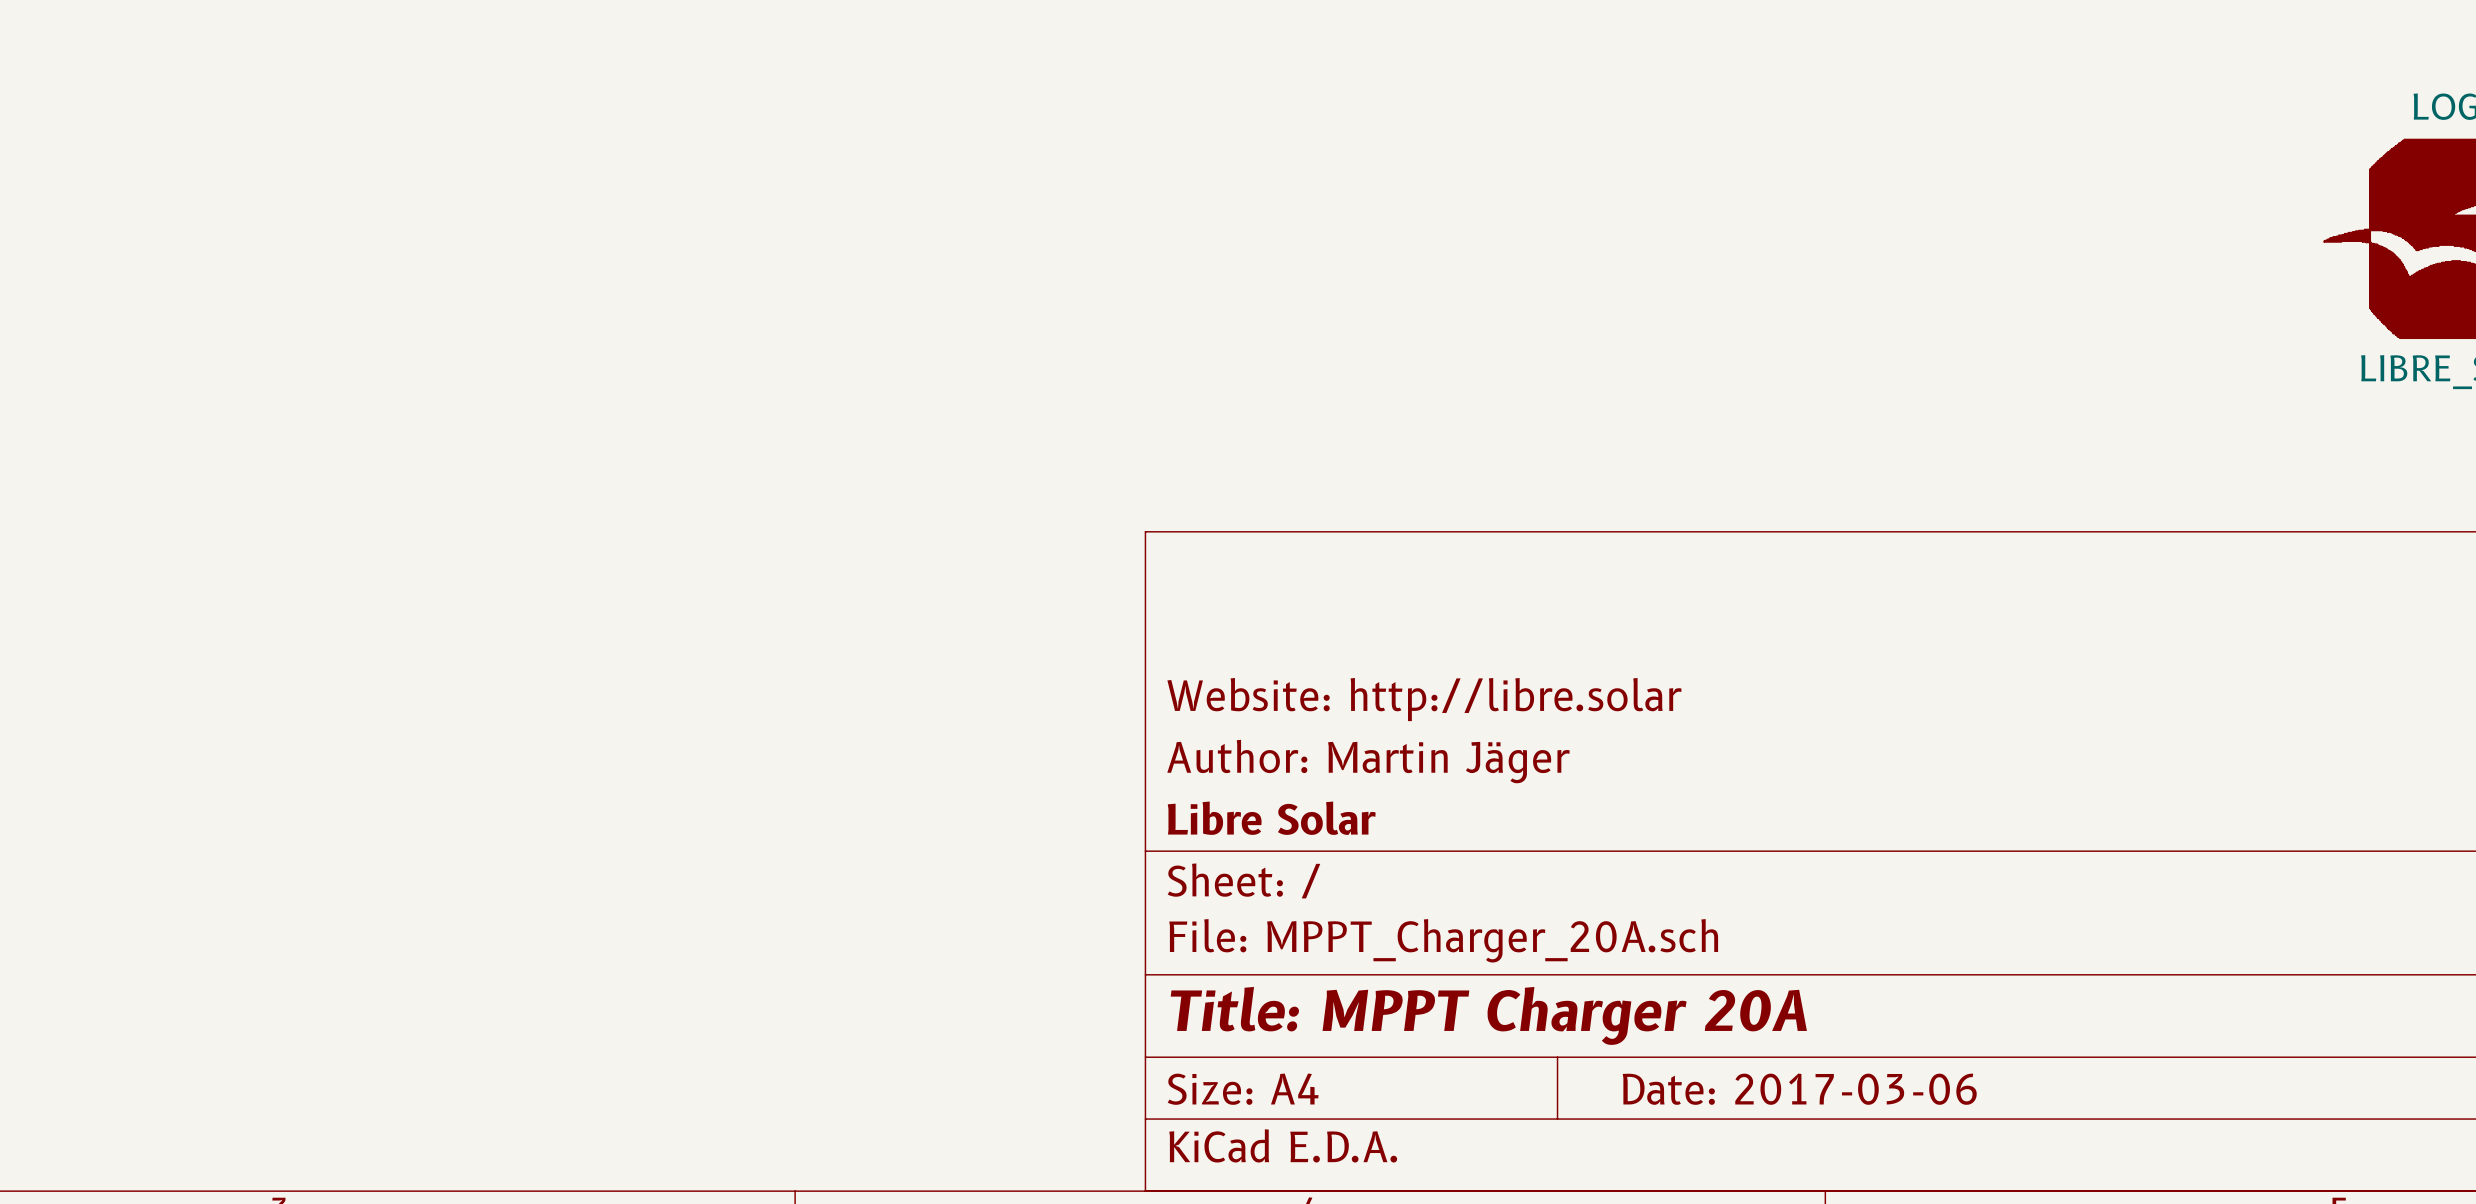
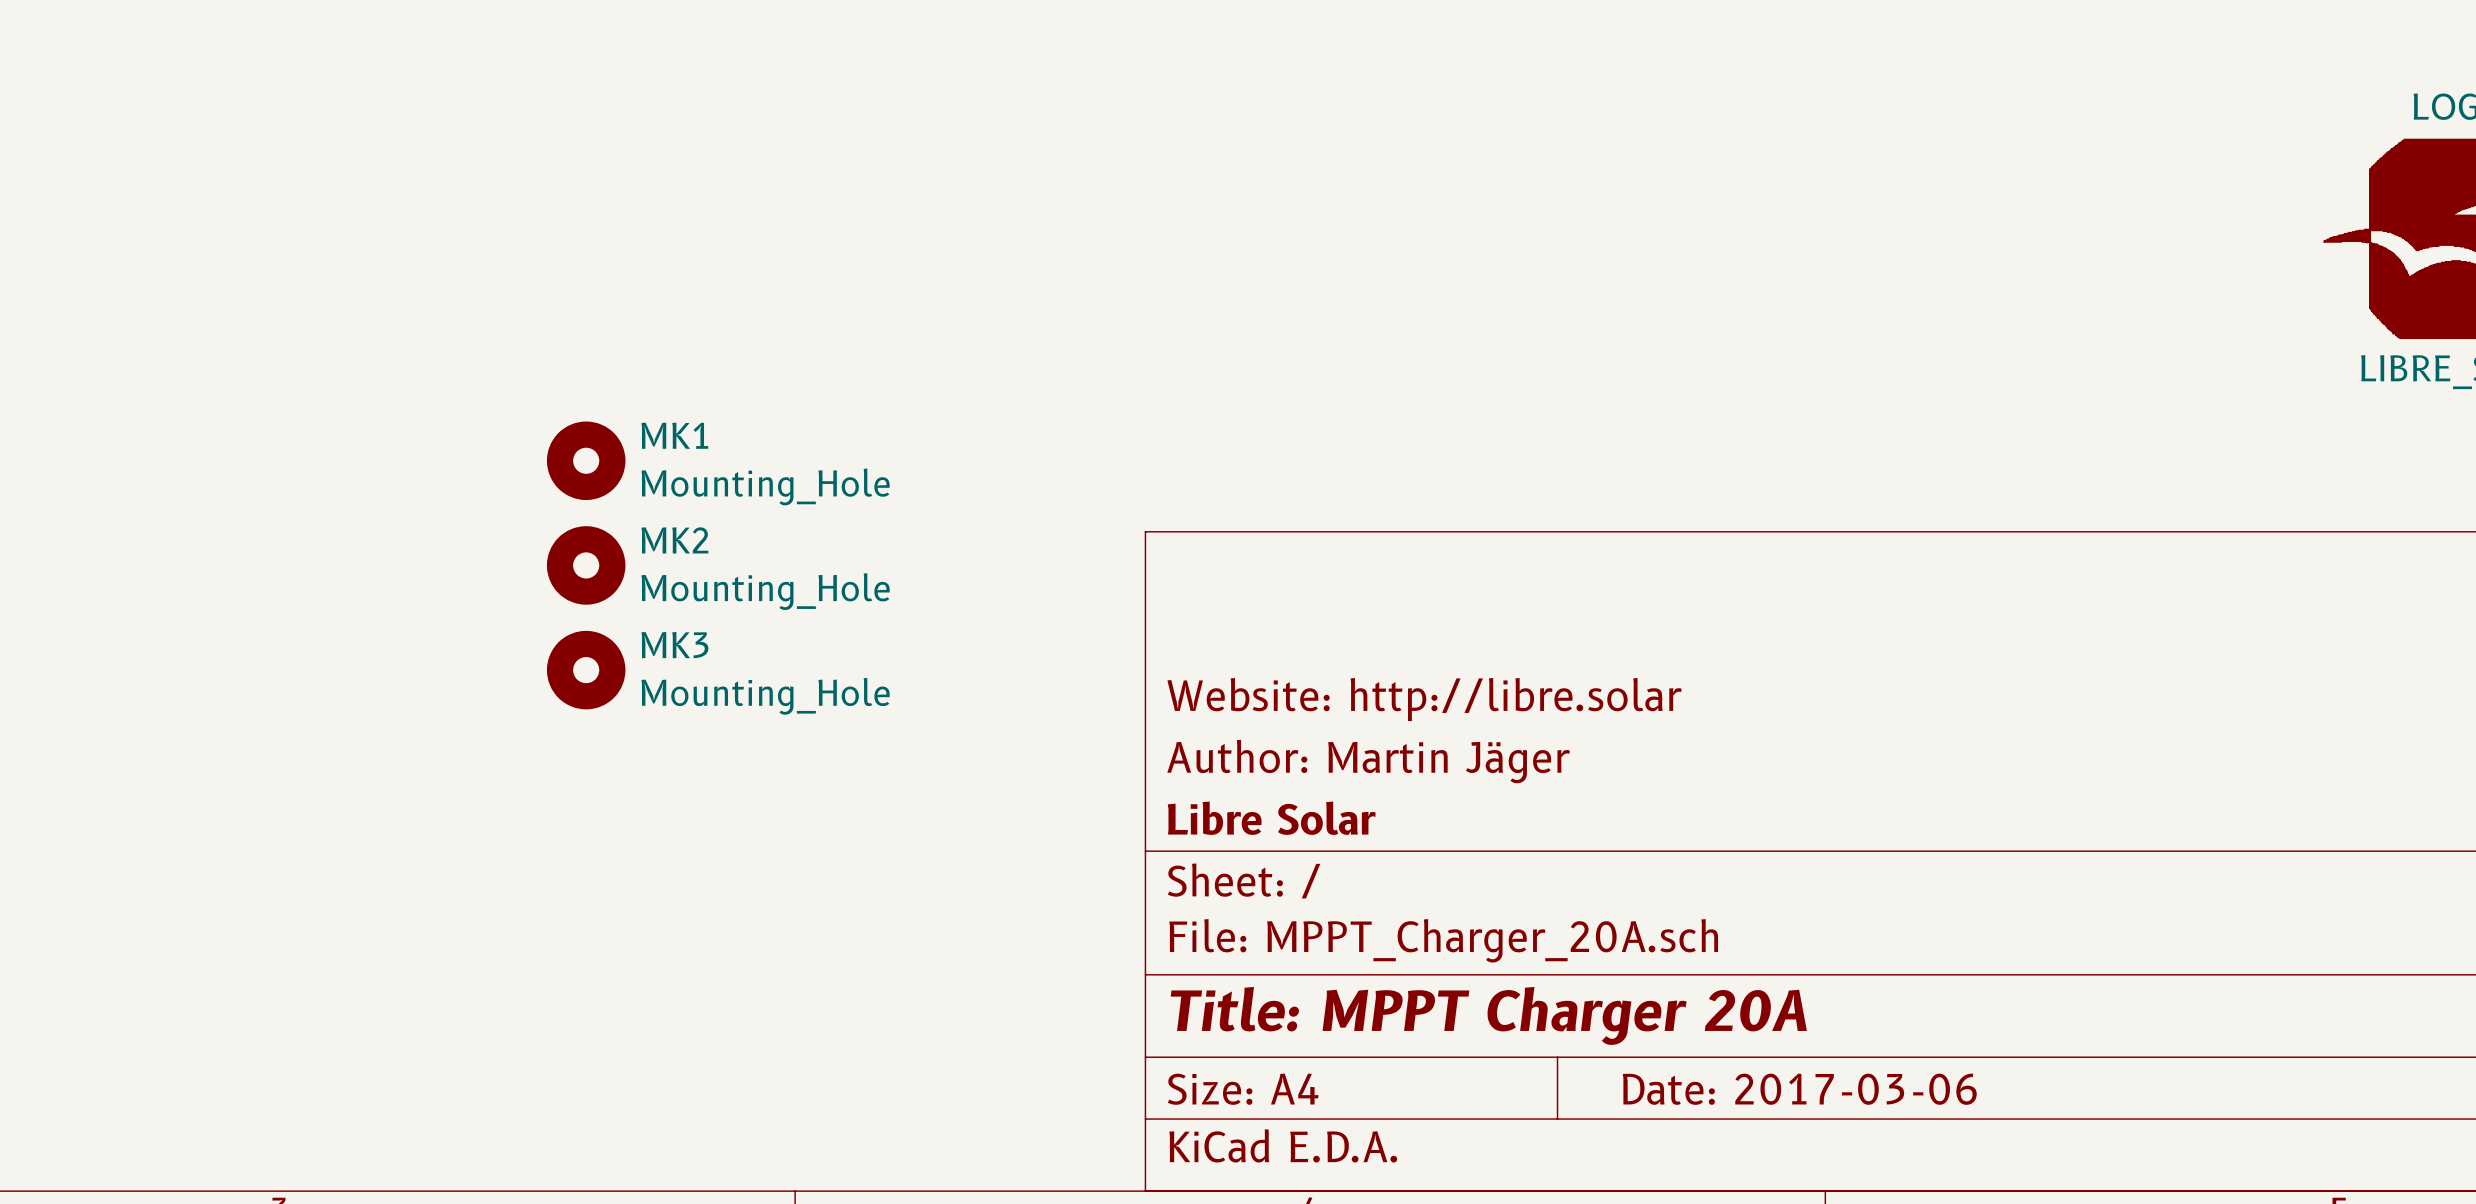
MK1: none -> Mounting_Hole (586, 460)
MK2: none -> Mounting_Hole (586, 565)
MK3: none -> Mounting_Hole (586, 670)

